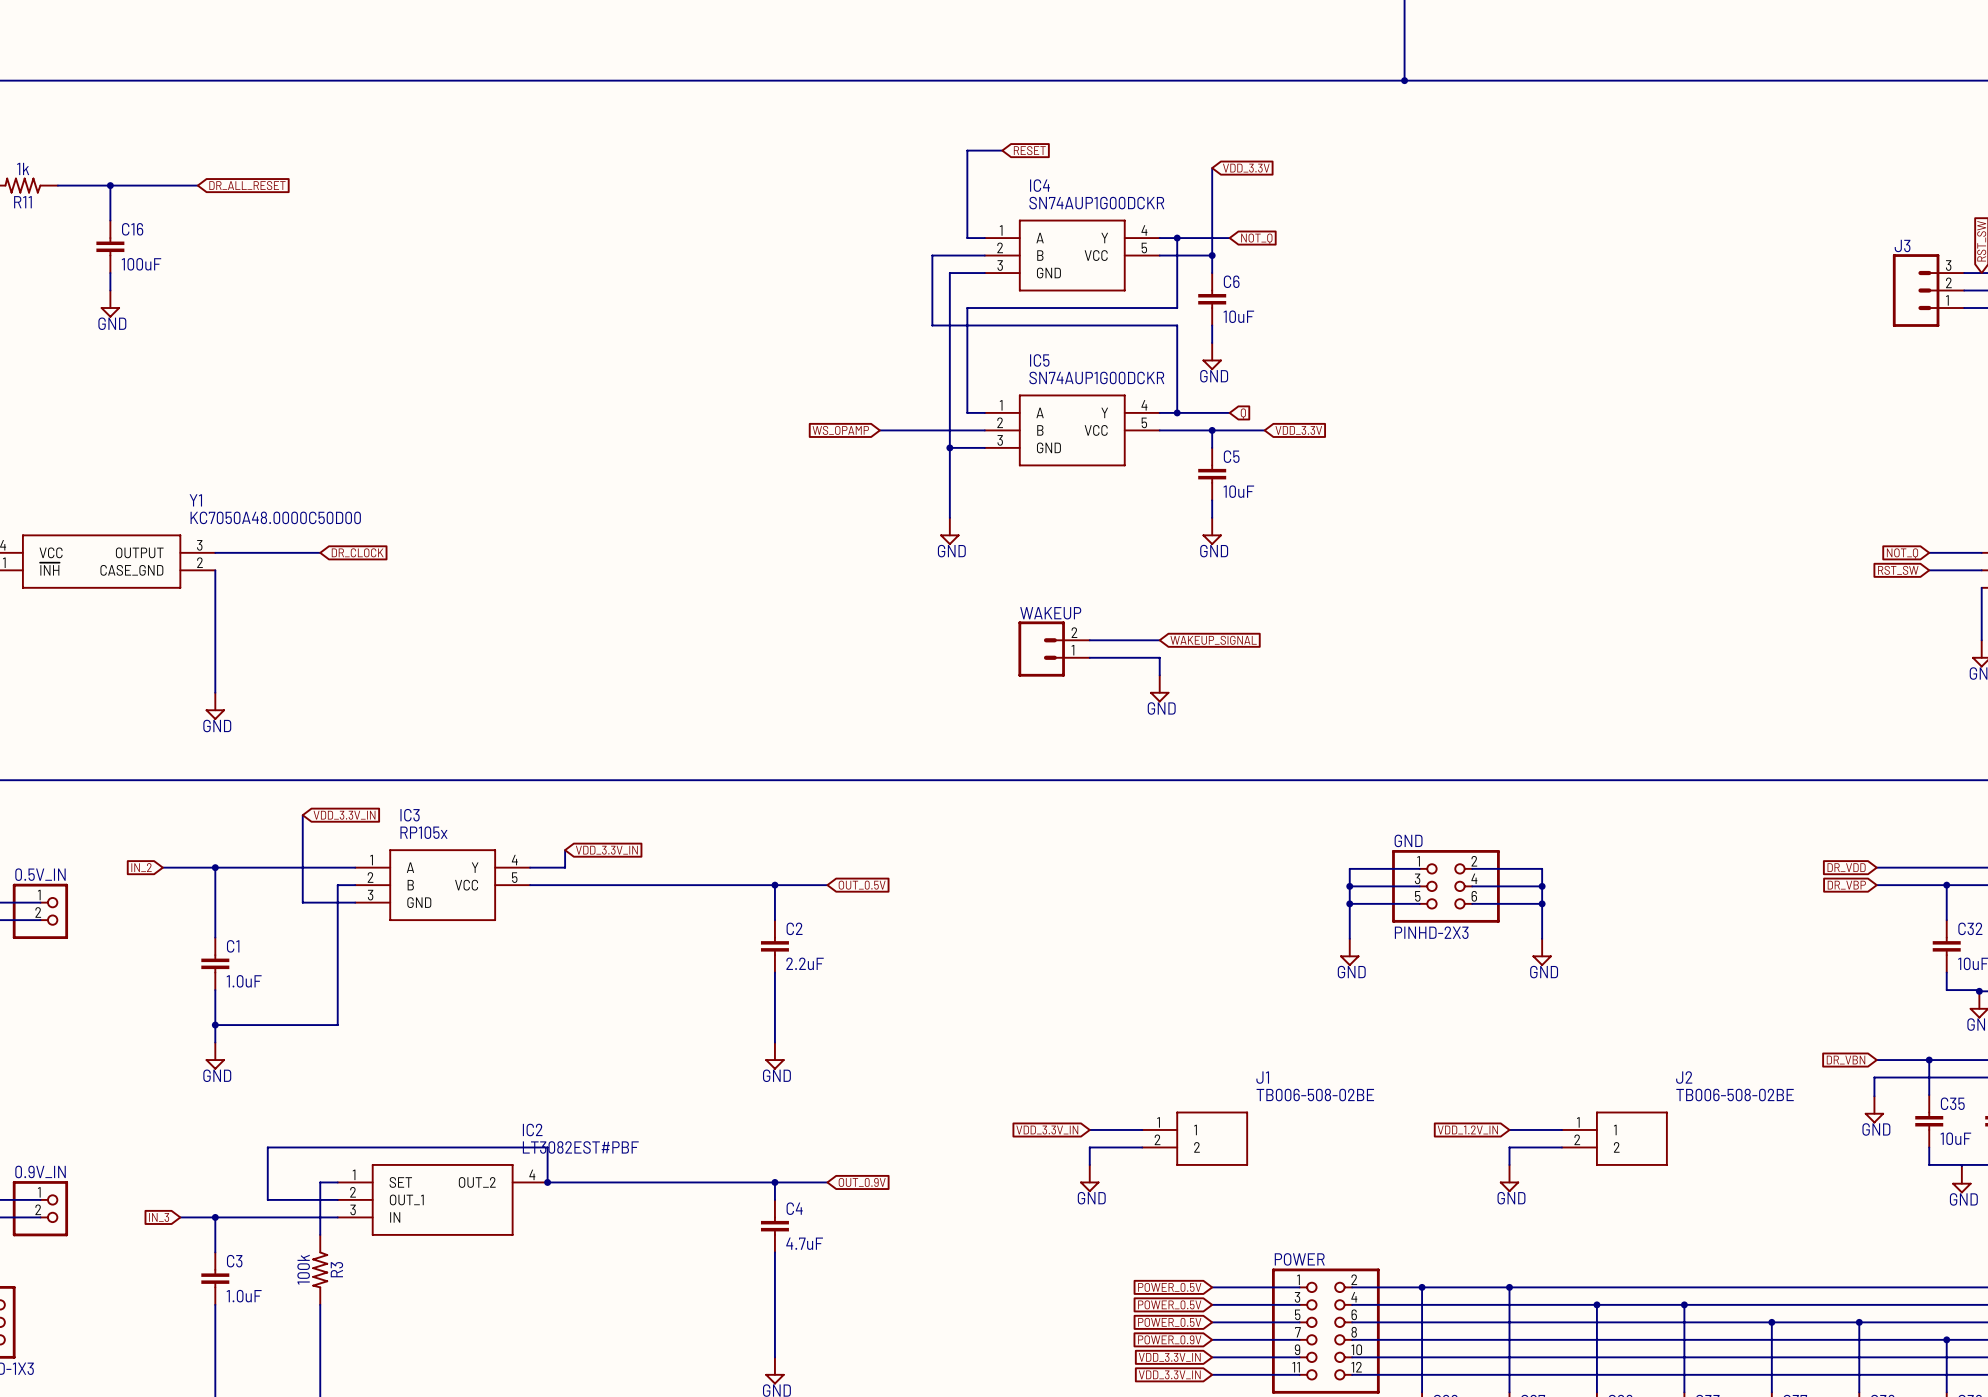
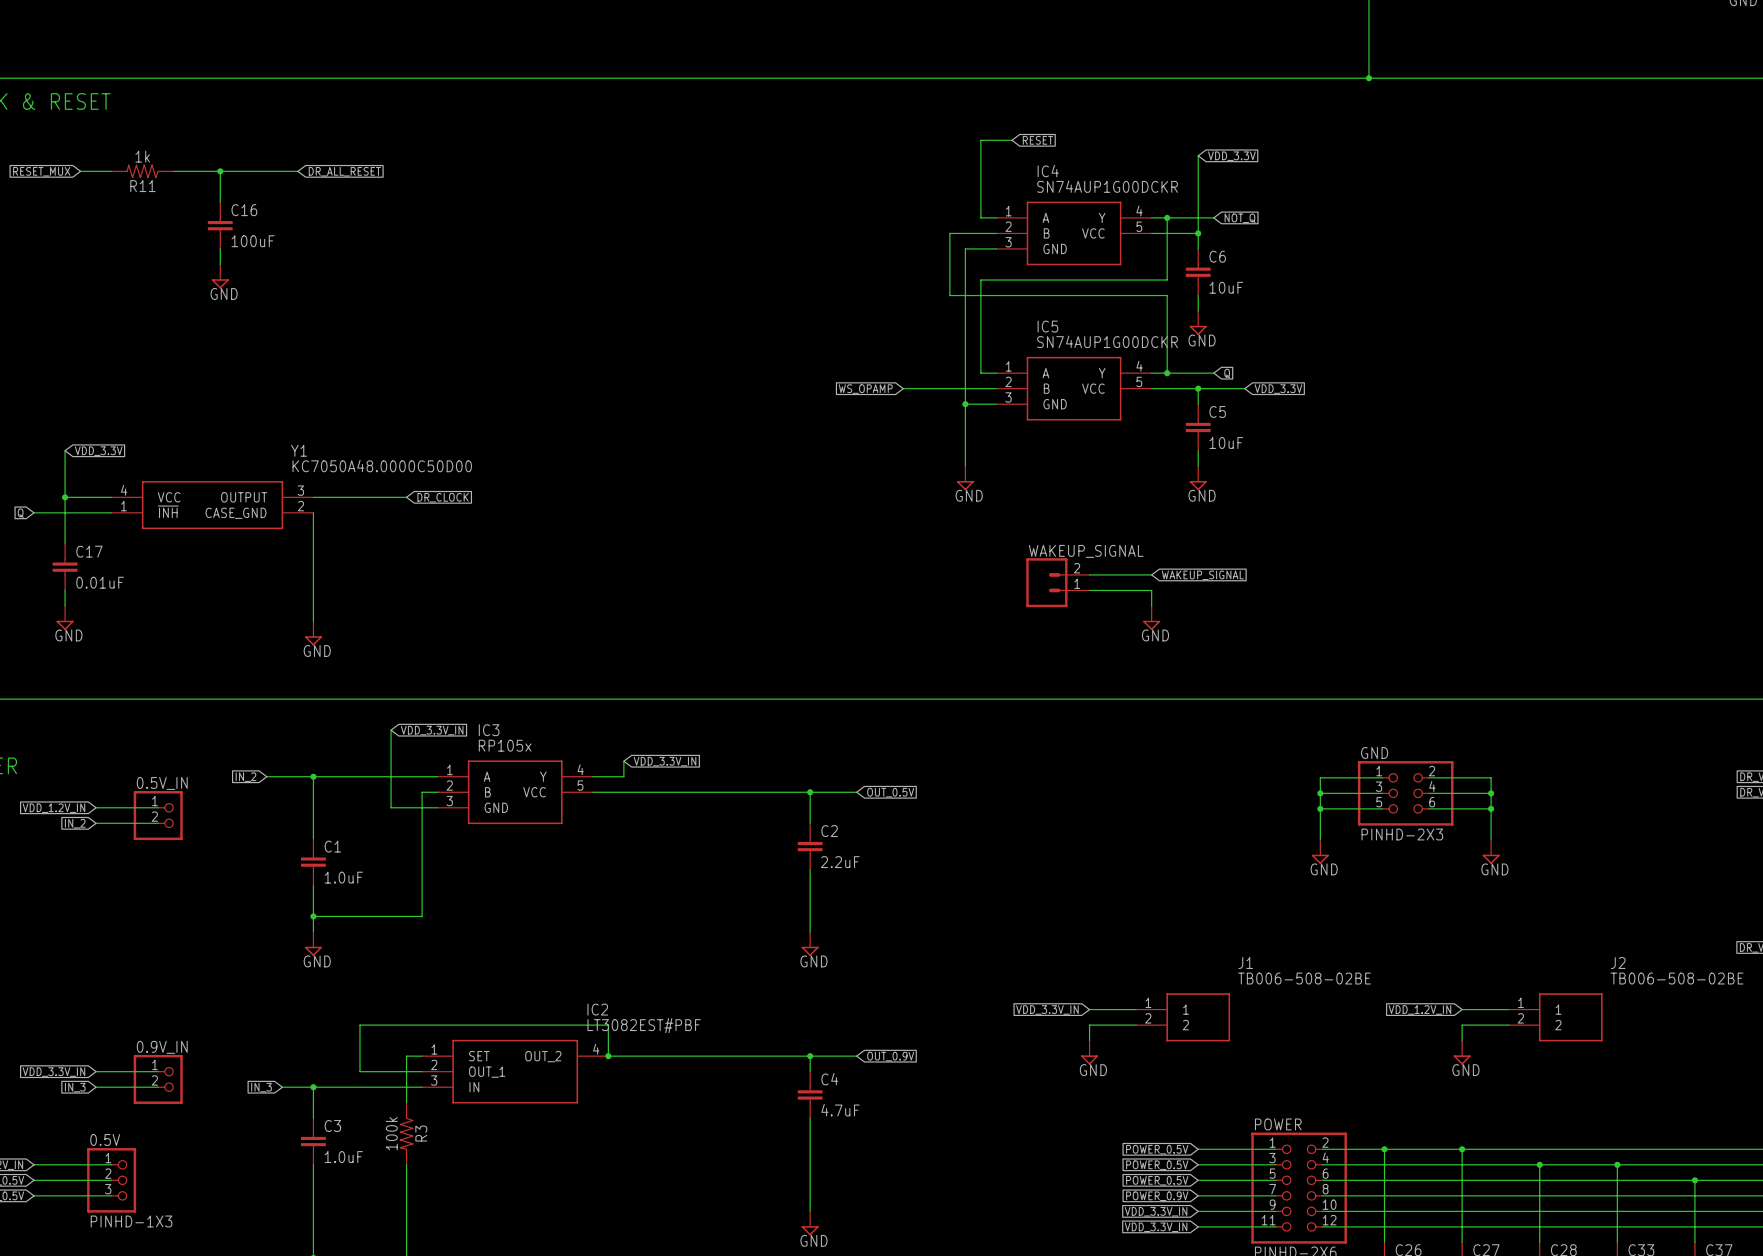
WAKEUP name: WAKEUP (1050, 613) -> WAKEUP_SIGNAL (1086, 551)

